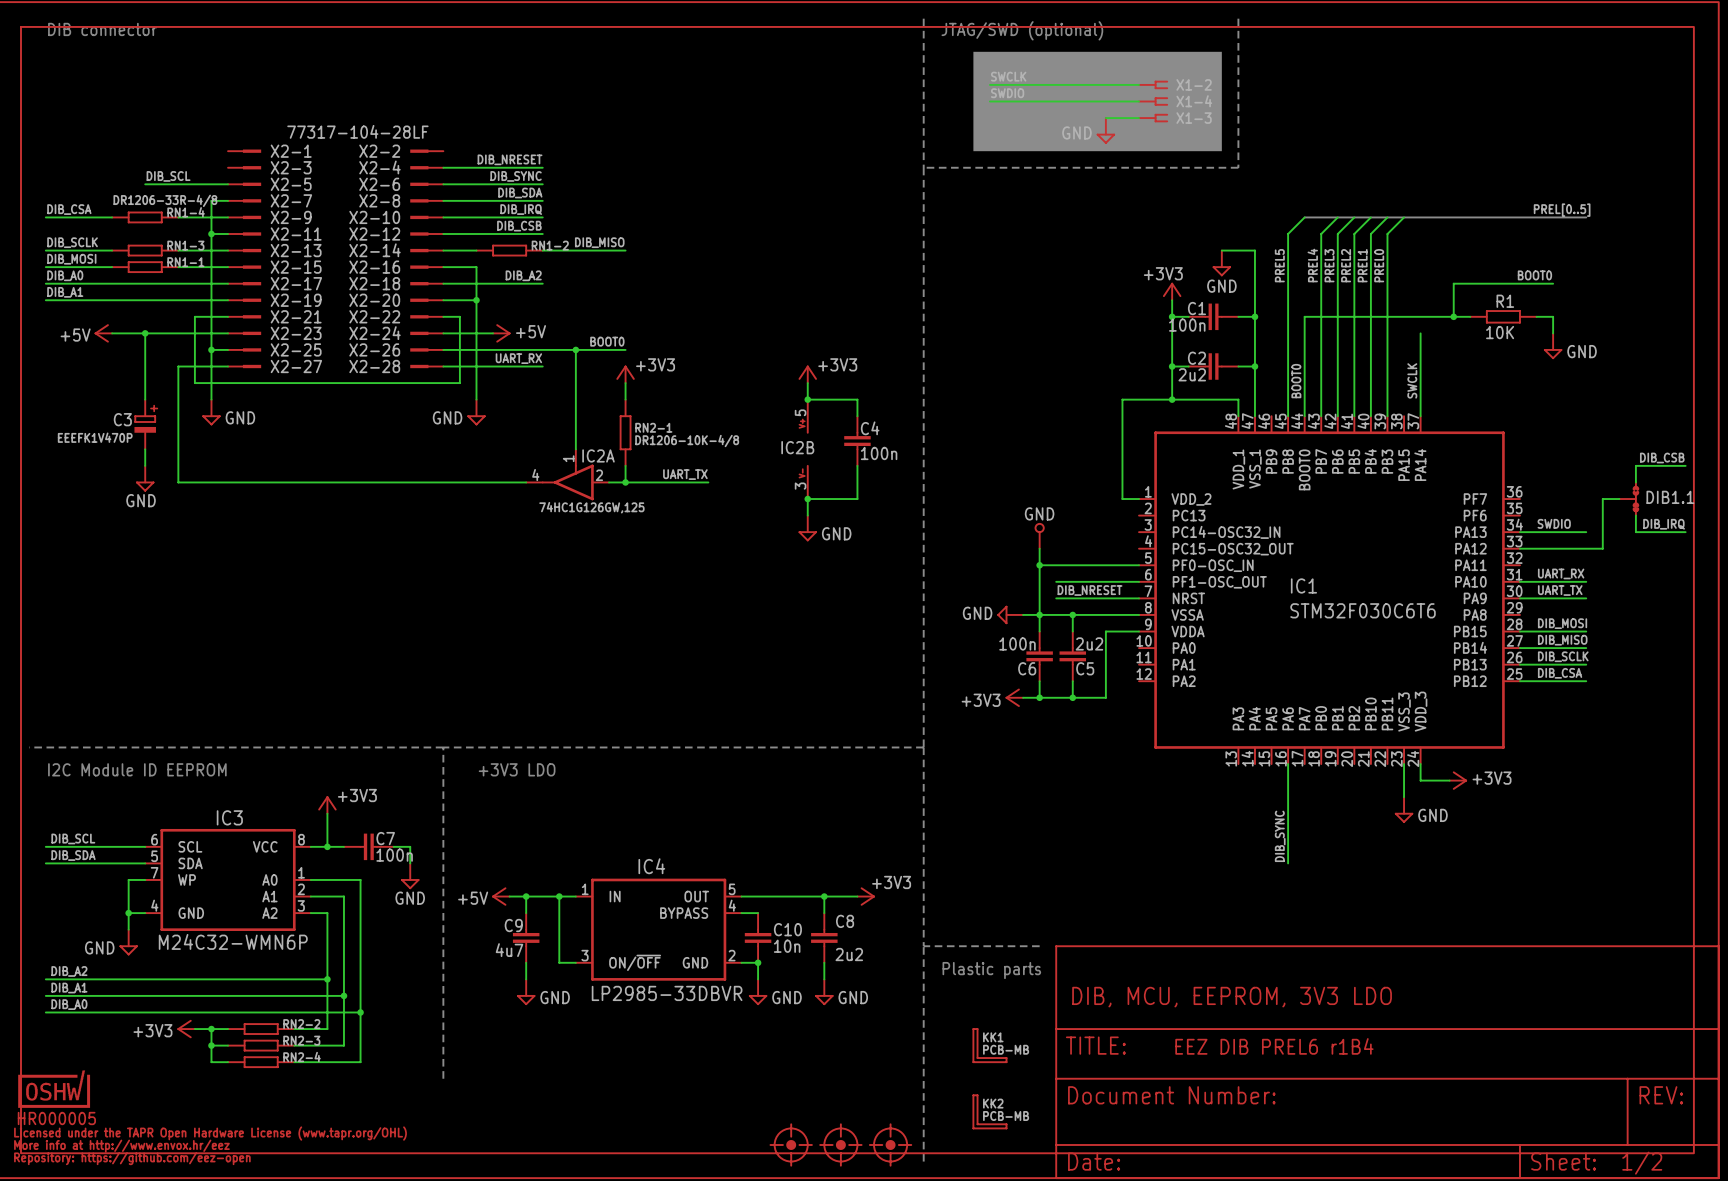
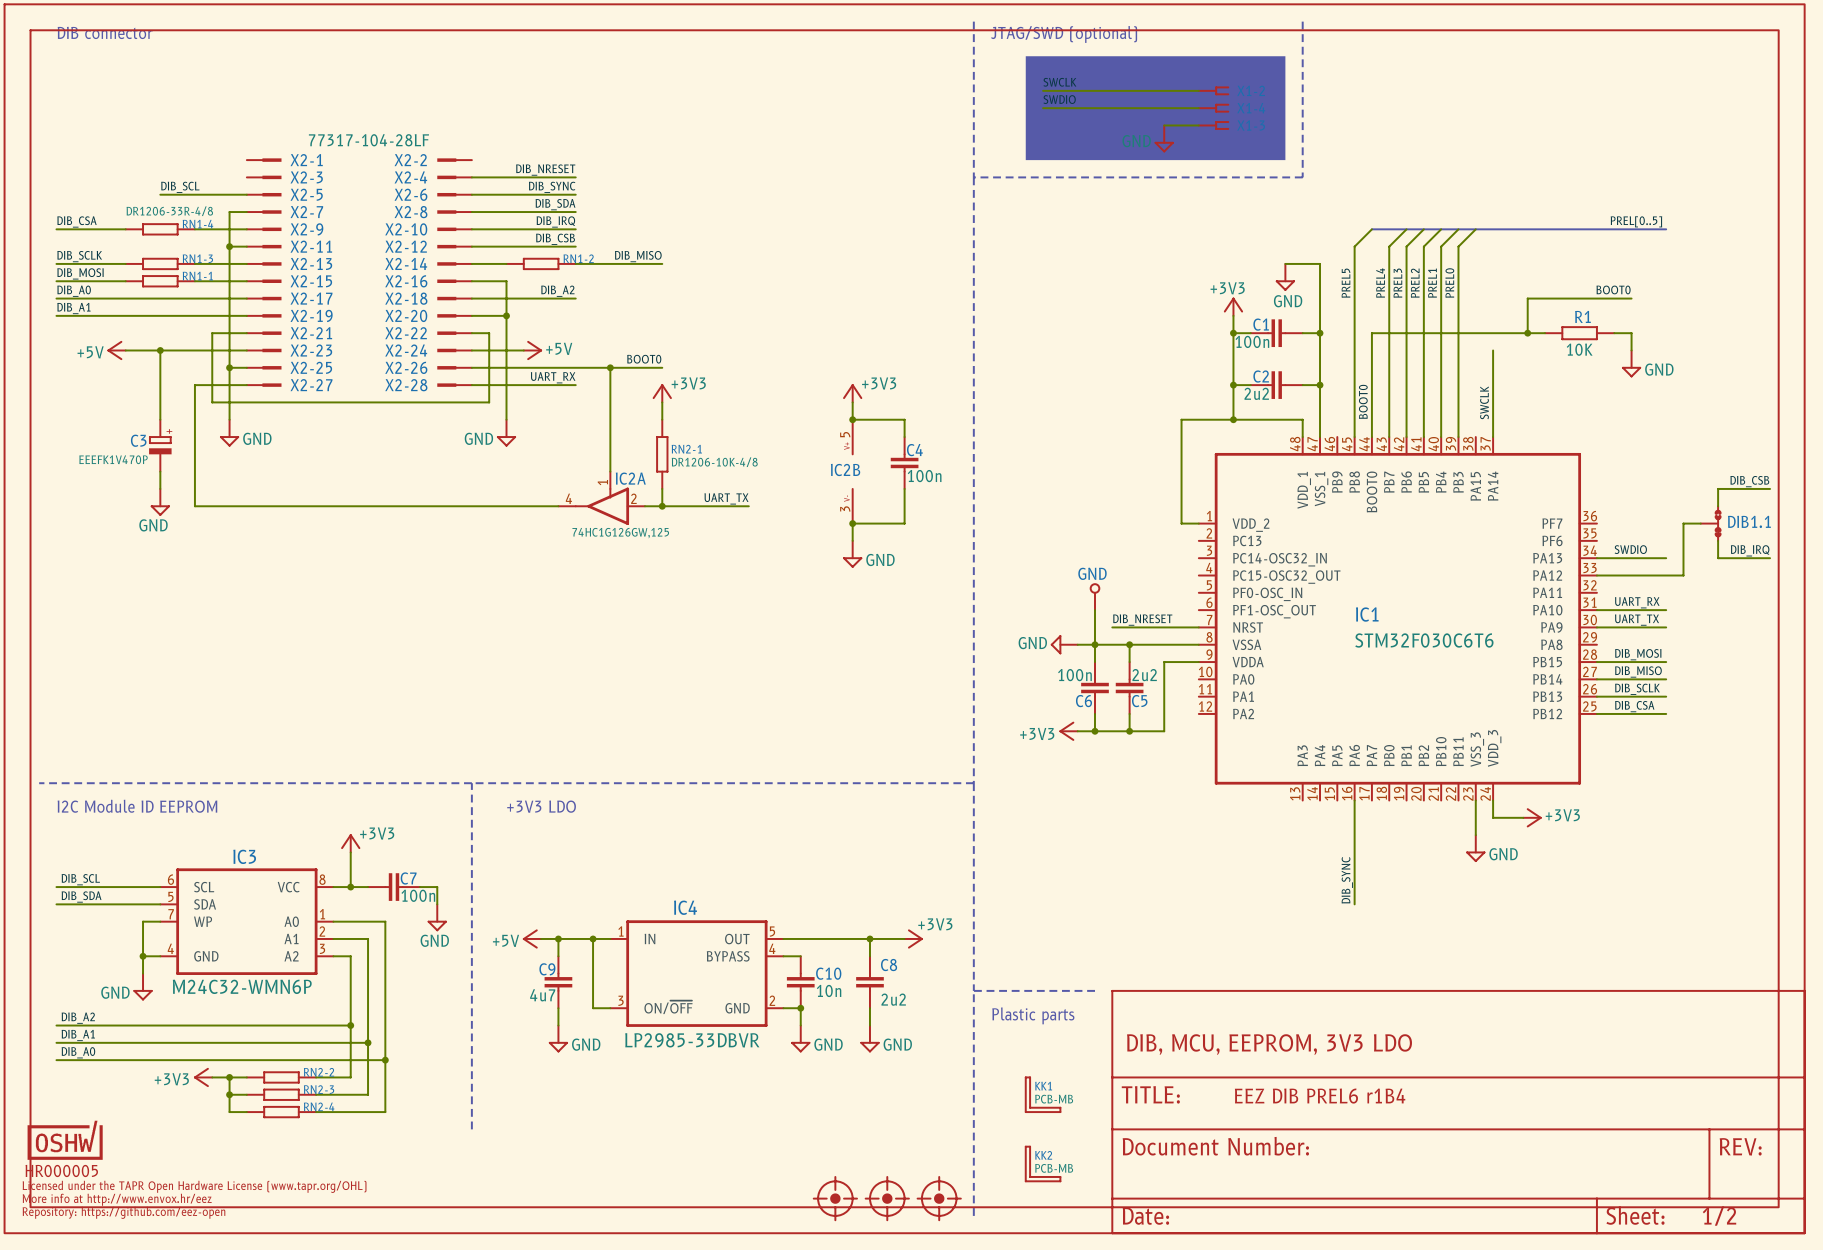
GND position: (1039, 536) -> (1094, 597)
wire: (1039, 565) (1139, 565) -> none
junction: (1039, 565) -> none
wire: (1056, 581) (1139, 581) -> none

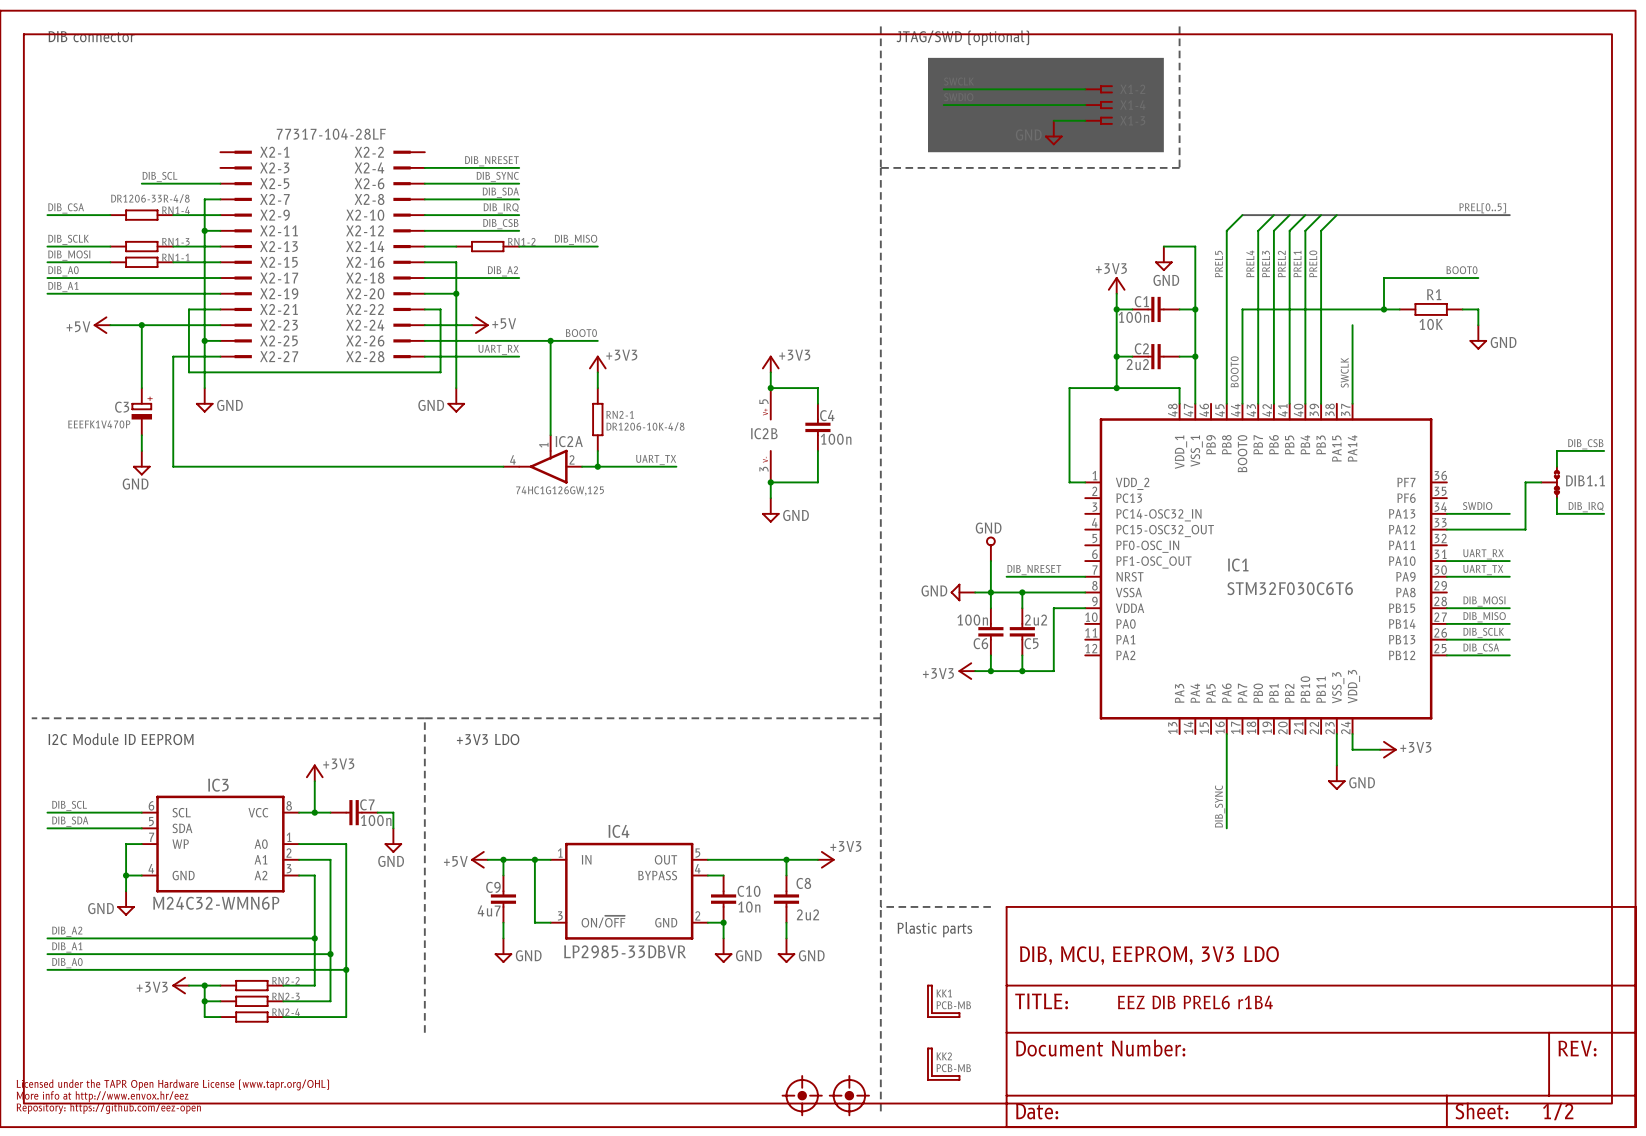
part: HR000005 (65, 1140) -> none
part: (835, 1198) -> none

